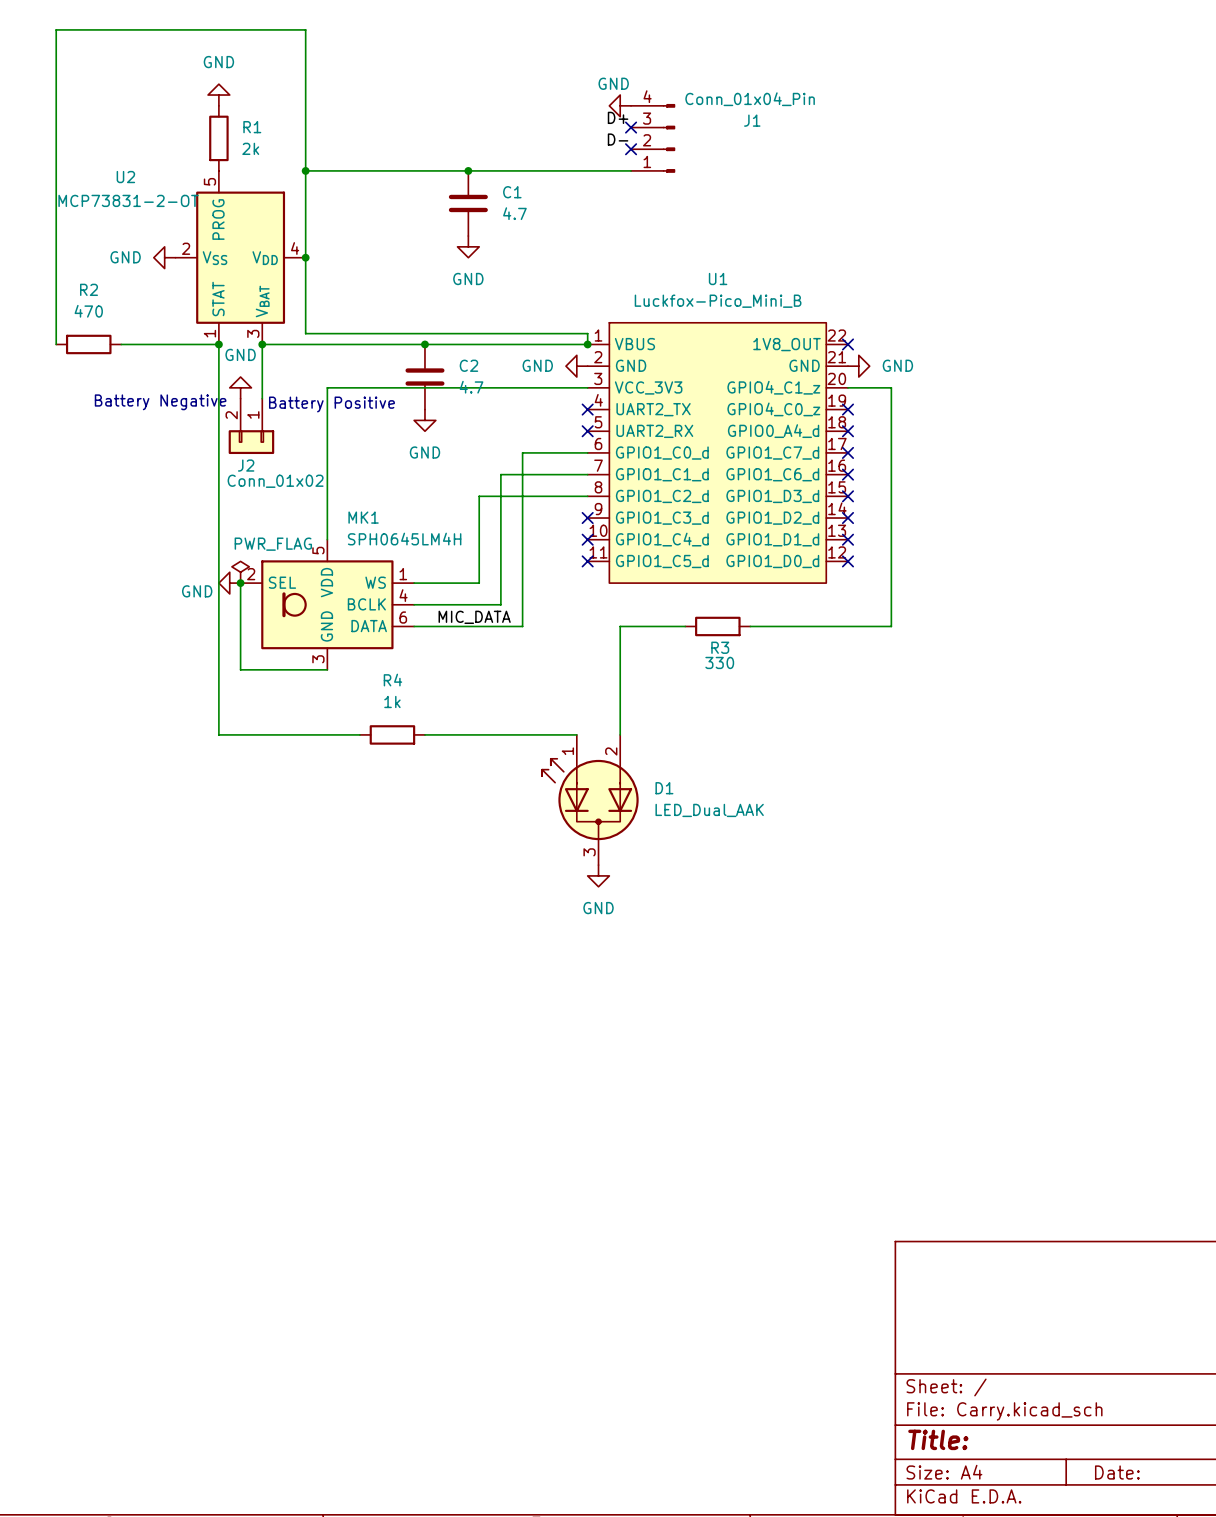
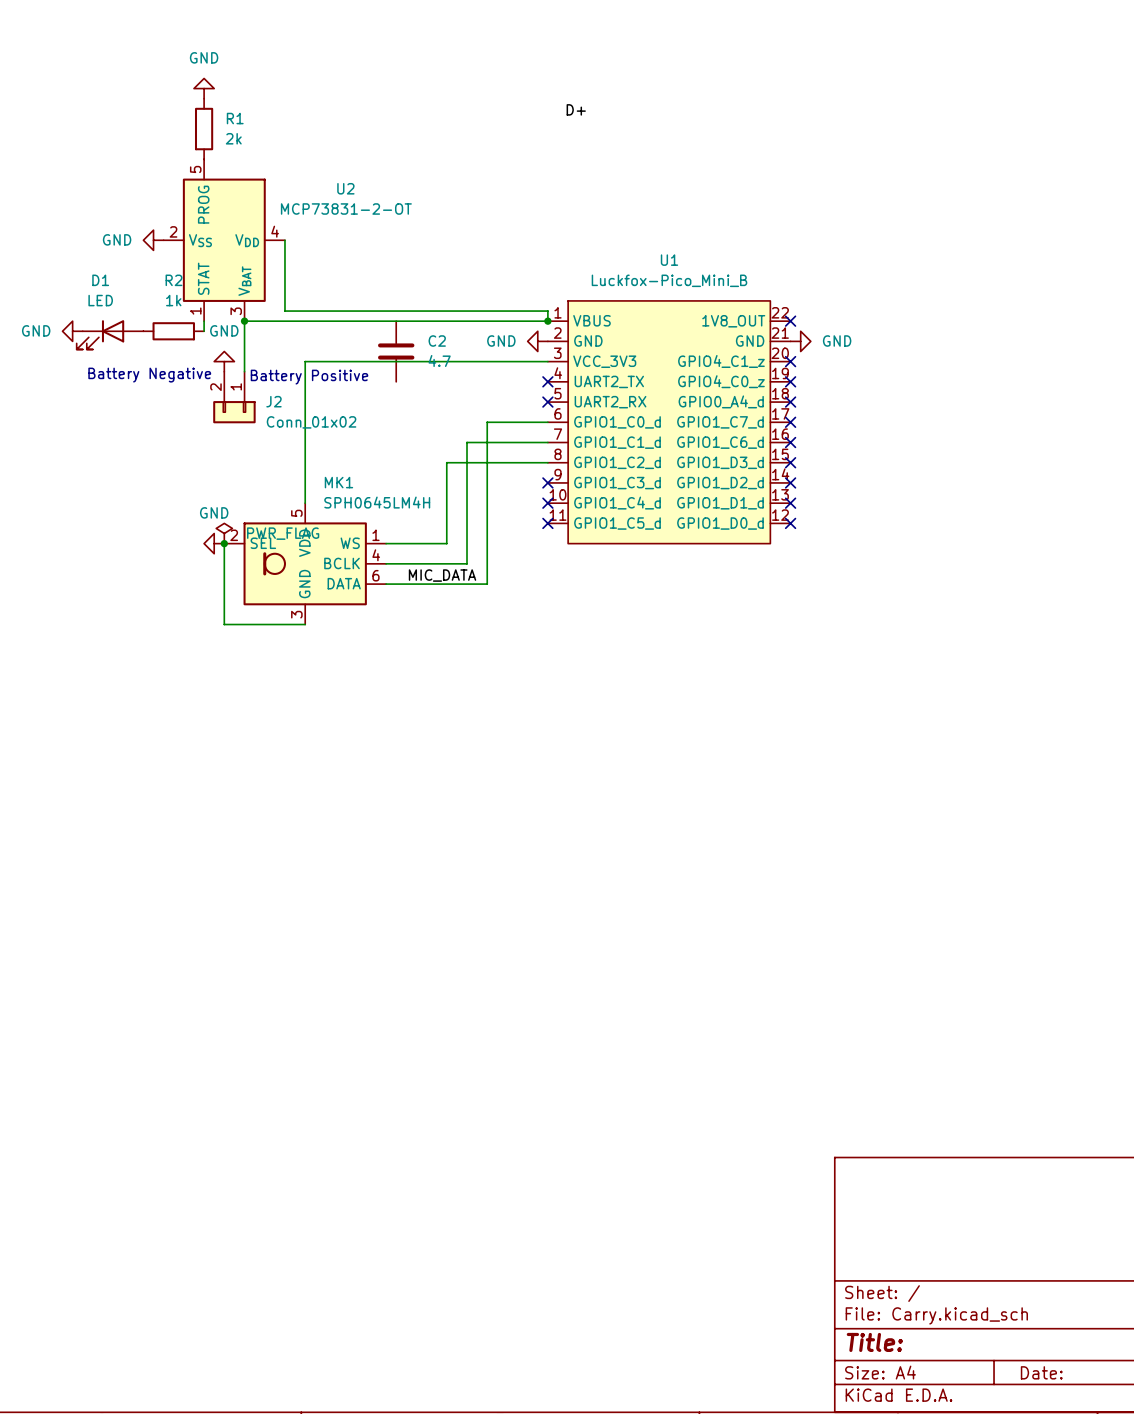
power symbol: GND (620, 105) -> none
no-connect mark: (631, 127) -> none
J1: Conn_01x04_Pin (653, 138) -> none
label: D- (618, 139) -> none
no-connect mark: (631, 149) -> none
wire: (305, 170) (631, 170) -> none
junction: (305, 170) -> none
junction: (468, 170) -> none
U2 name position: U2 (125, 177) -> U2 (345, 188)
U2 value position: MCP73831-2-OT (128, 200) -> MCP73831-2-OT (346, 208)
C1: 4.7 (468, 203) -> none
power symbol: GND (468, 246) -> none
wire: (305, 257) (305, 29) (56, 29) (56, 344) -> none
junction: (305, 257) -> none
R2 value: 470 (88, 311) -> 1k (173, 300)
R2 position: (88, 344) -> (173, 331)
wire: (121, 344) (218, 344) -> none
junction: (218, 344) -> none
junction: (424, 344) -> none
power symbol: none -> GND (72, 331)
wire: (218, 355) (218, 734) (359, 734) -> none
wire: (847, 387) (891, 387) (891, 626) (750, 626) -> none
no-connect mark: none -> (790, 361)
power symbol: GND (424, 420) -> none
J2 name position: J2 (246, 465) -> J2 (273, 401)
J2 value position: Conn_01x02 (275, 481) -> Conn_01x02 (311, 422)
power symbol text position: PWR_FLAG (273, 544) -> PWR_FLAG (283, 533)
power symbol text position: GND (197, 591) -> GND (214, 512)
wire: (685, 626) (620, 626) (620, 734) -> none
R3: 330 (717, 626) -> none
R4: 1k (392, 734) -> none
wire: (424, 734) (576, 734) -> none
D1 symbol: [542, 734, 639, 866] -> [76, 320, 144, 350]
D1 name position: D1 (664, 788) -> D1 (100, 280)
D1 value: LED_Dual_AAK (709, 810) -> LED (100, 300)
power symbol: GND (598, 875) -> none

